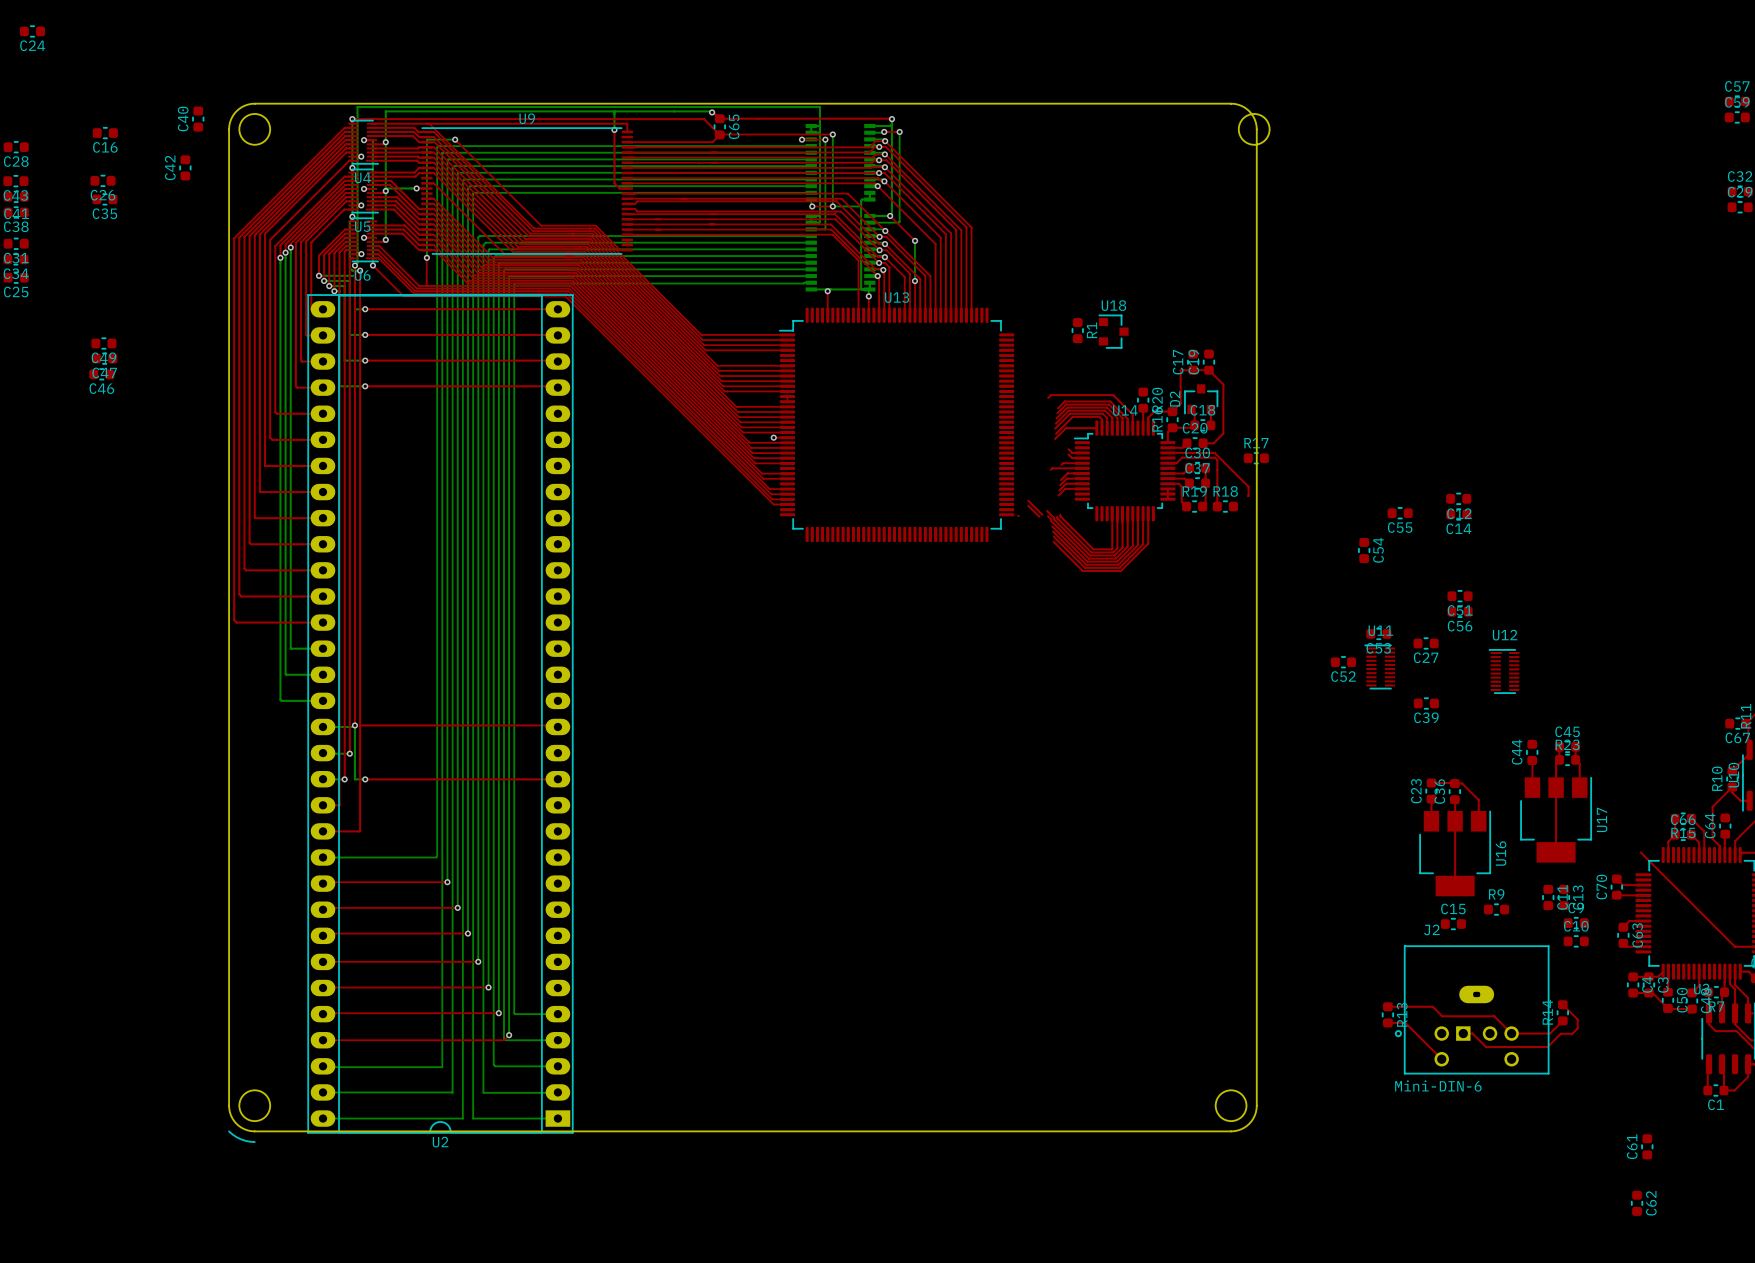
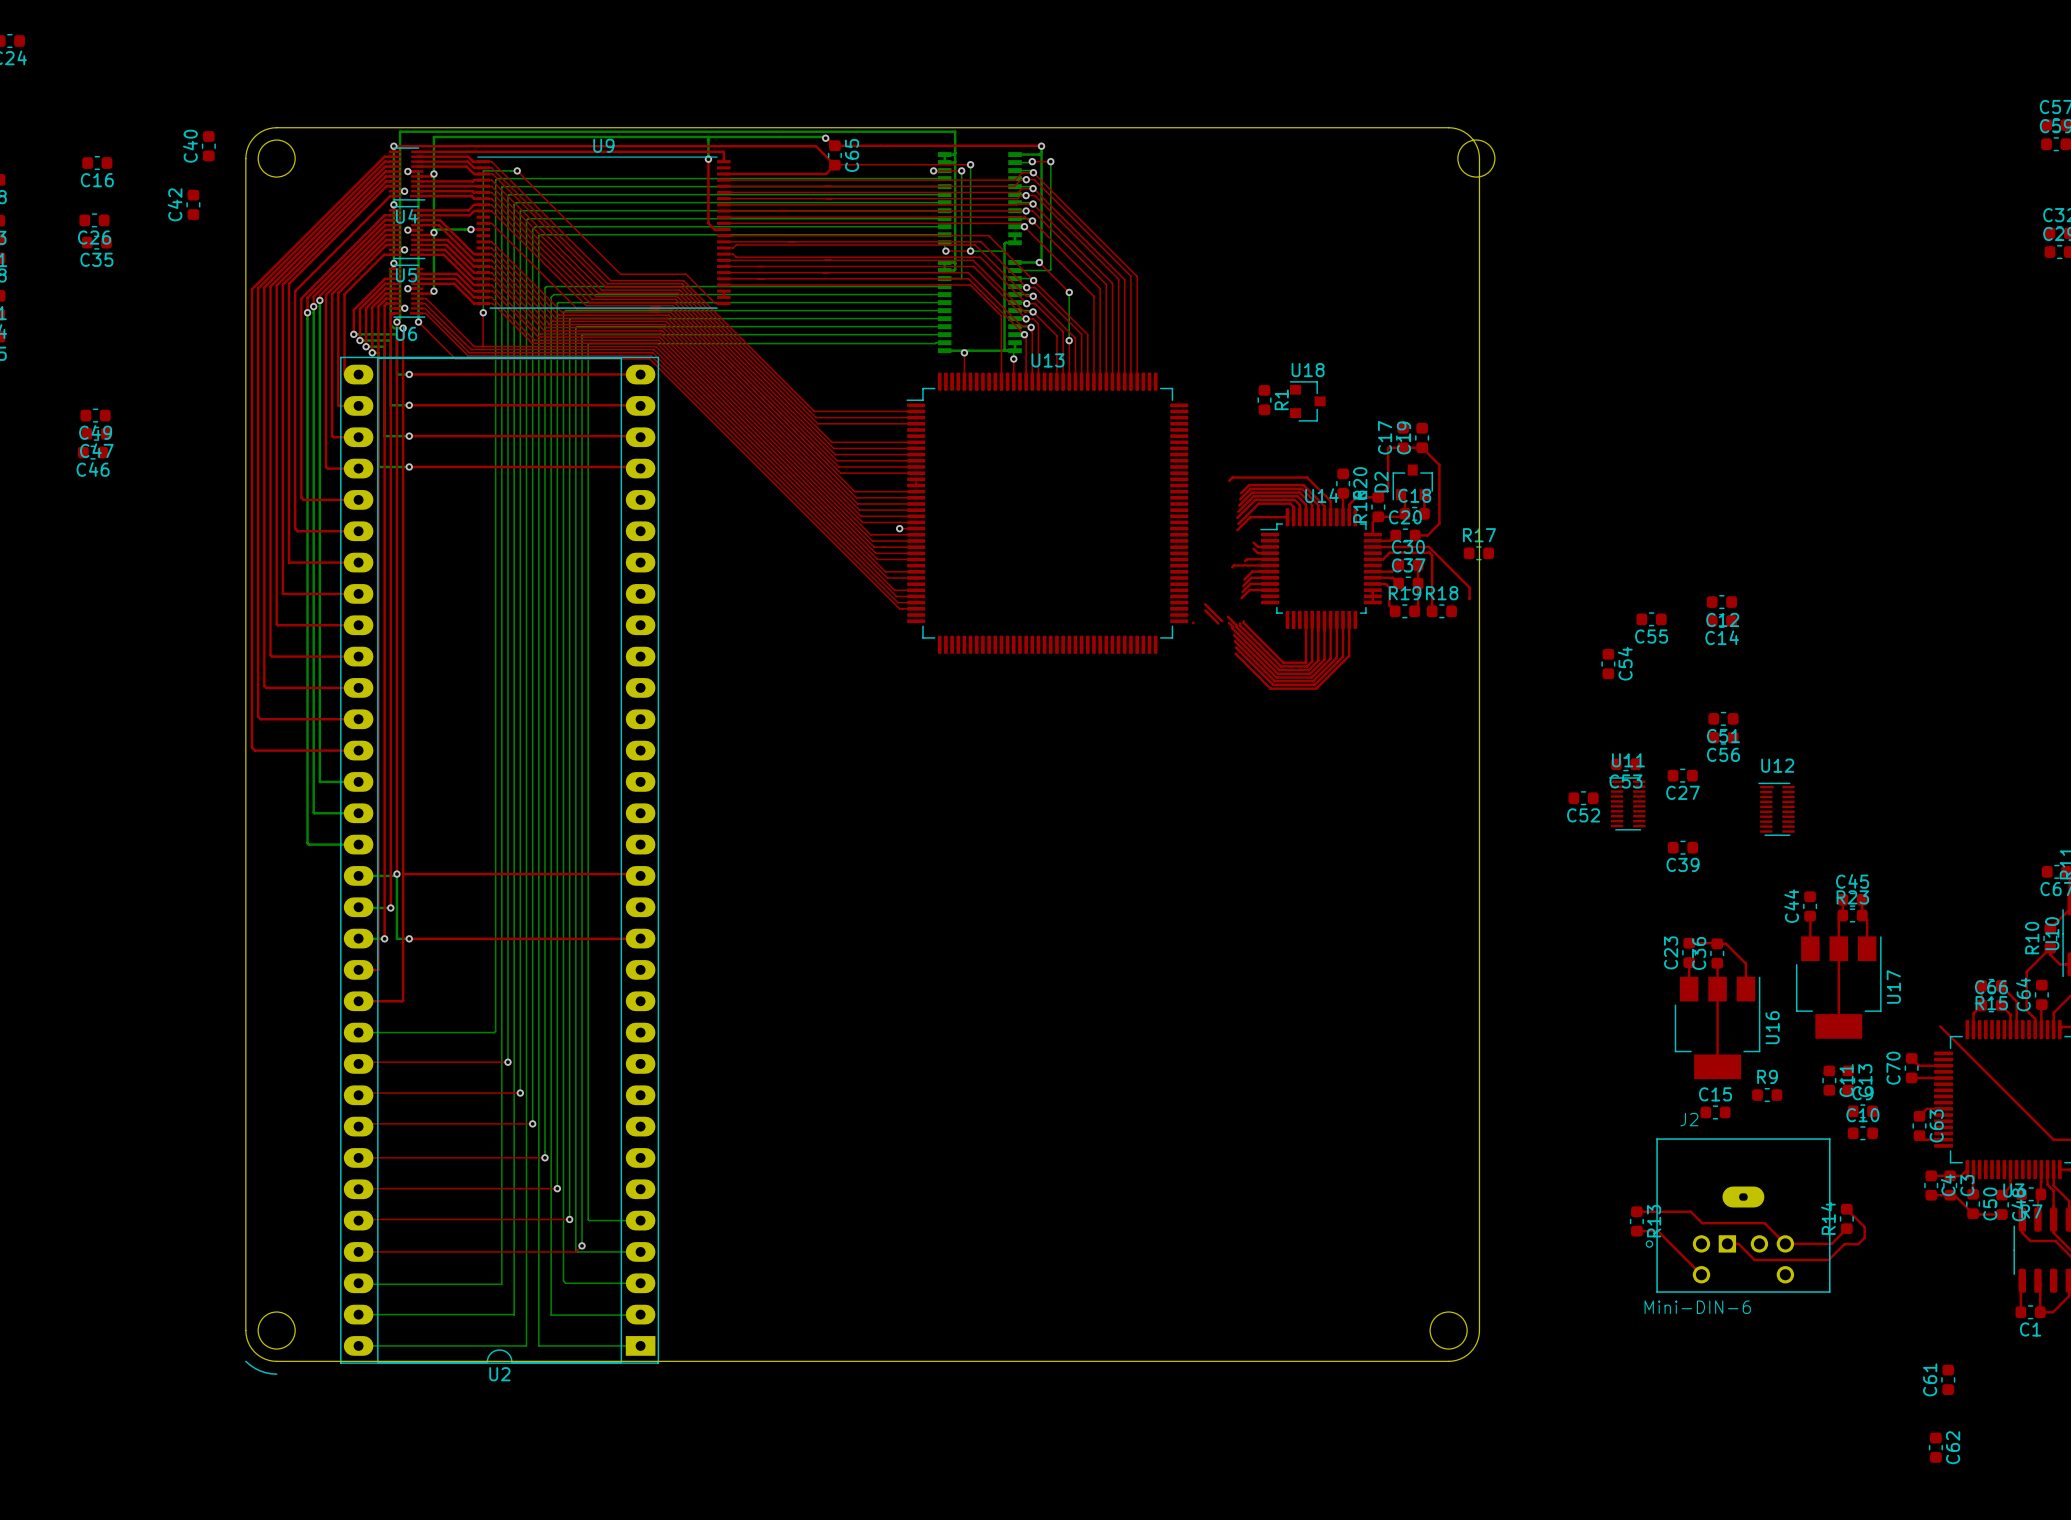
top track: (426, 123) (429, 123) (534, 228) (594, 228) (701, 334) (787, 334) -> none

